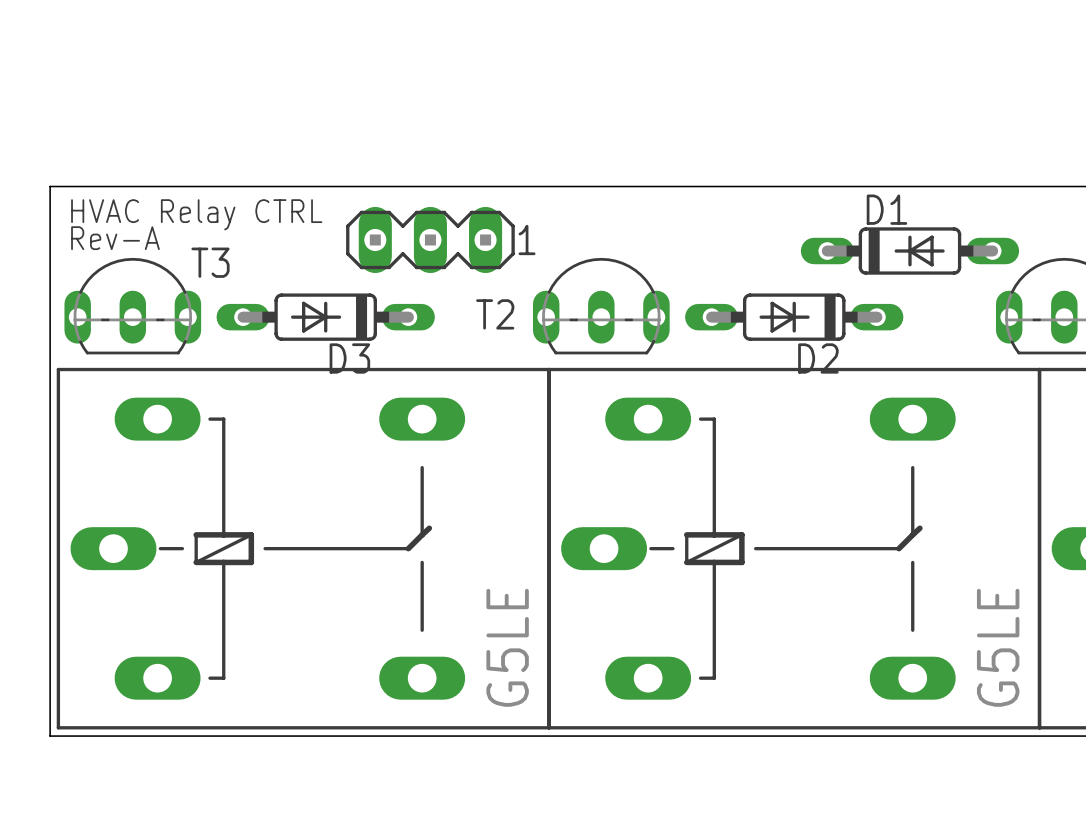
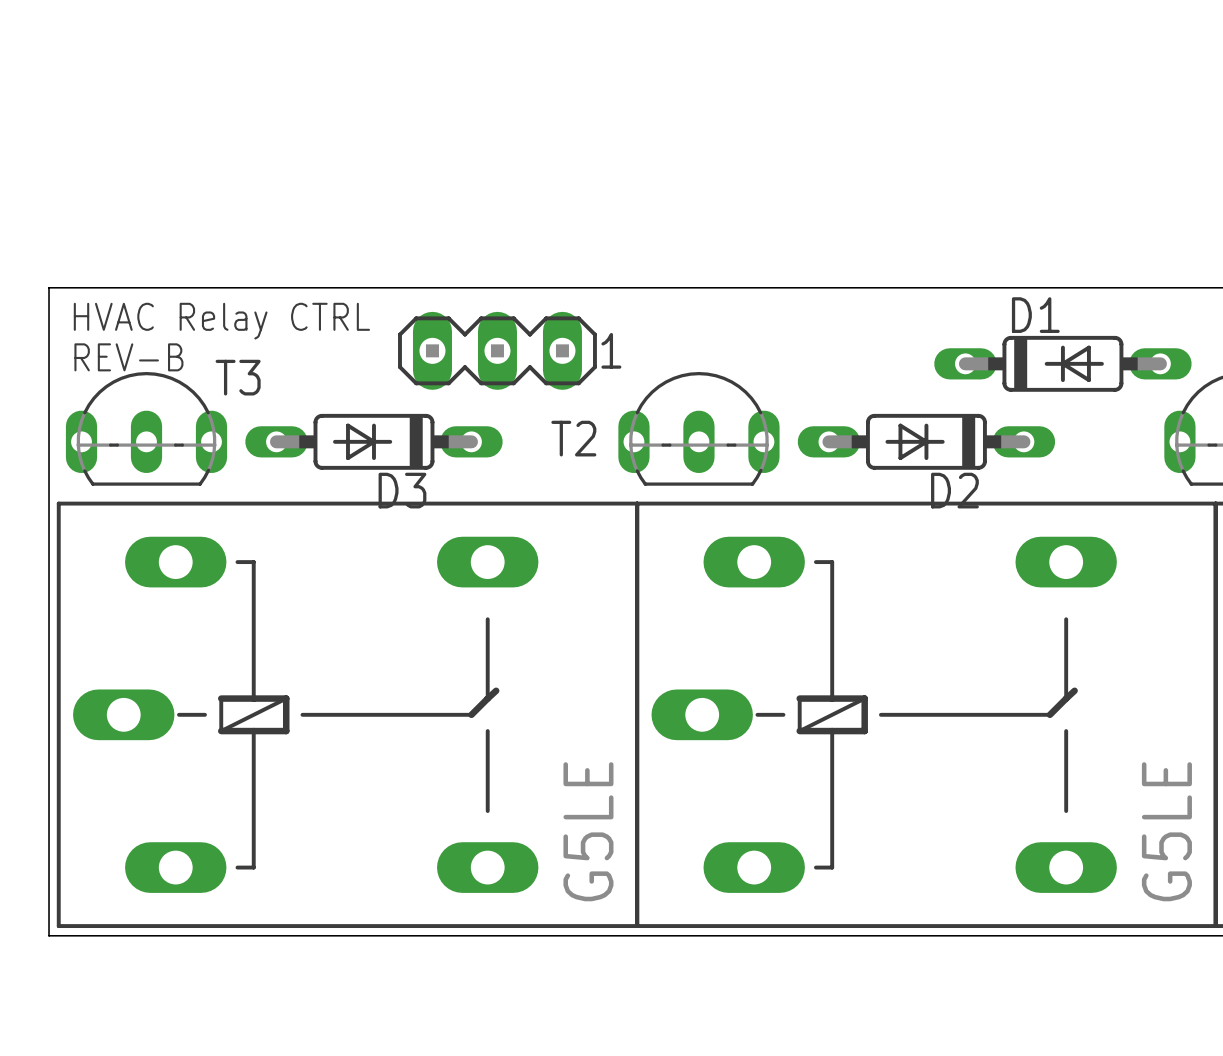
text: Rev-A (115, 238) -> REV-B (128, 357)

